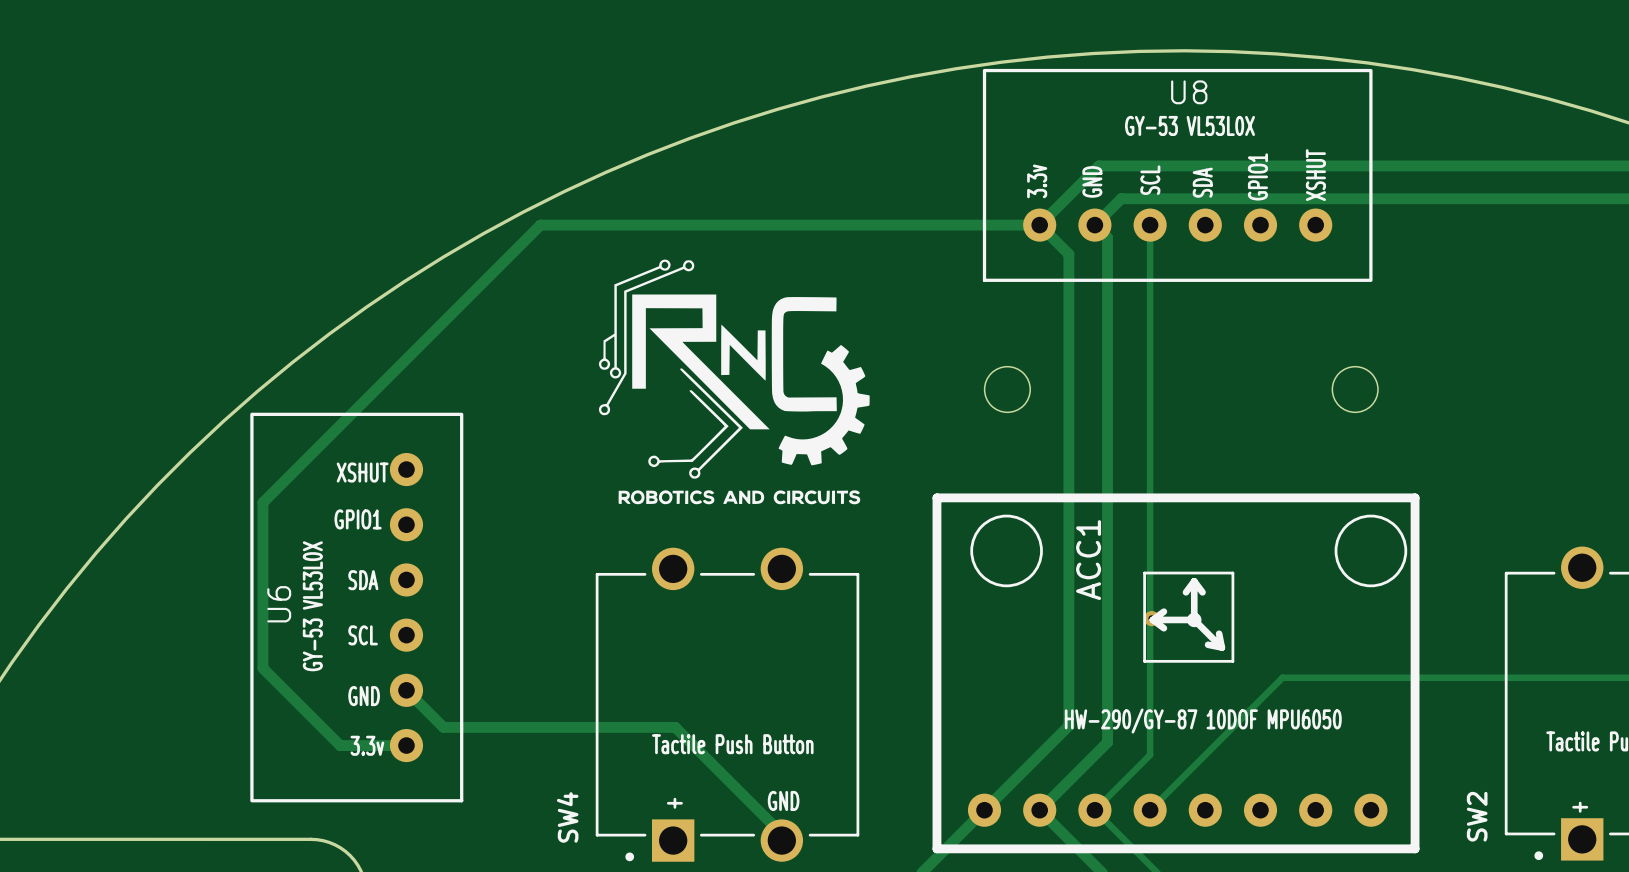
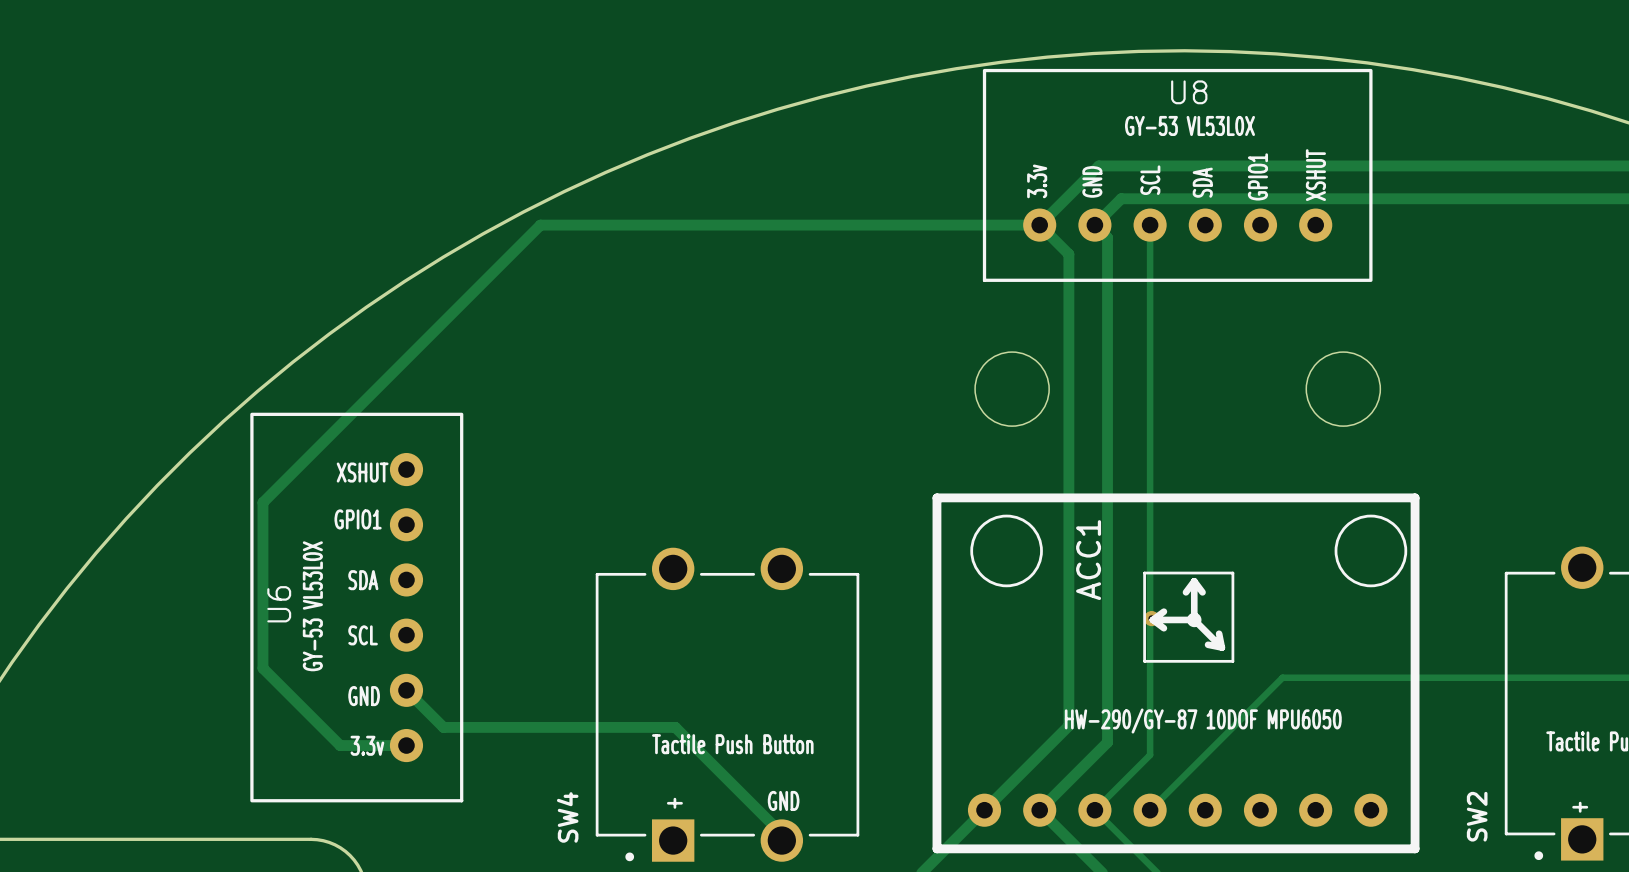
drawing: [598, 259, 870, 505] -> none
round board edge size: [984, 366, 1031, 413] -> [974, 351, 1050, 427]
round board edge size: [1331, 366, 1379, 413] -> [1305, 351, 1381, 427]

